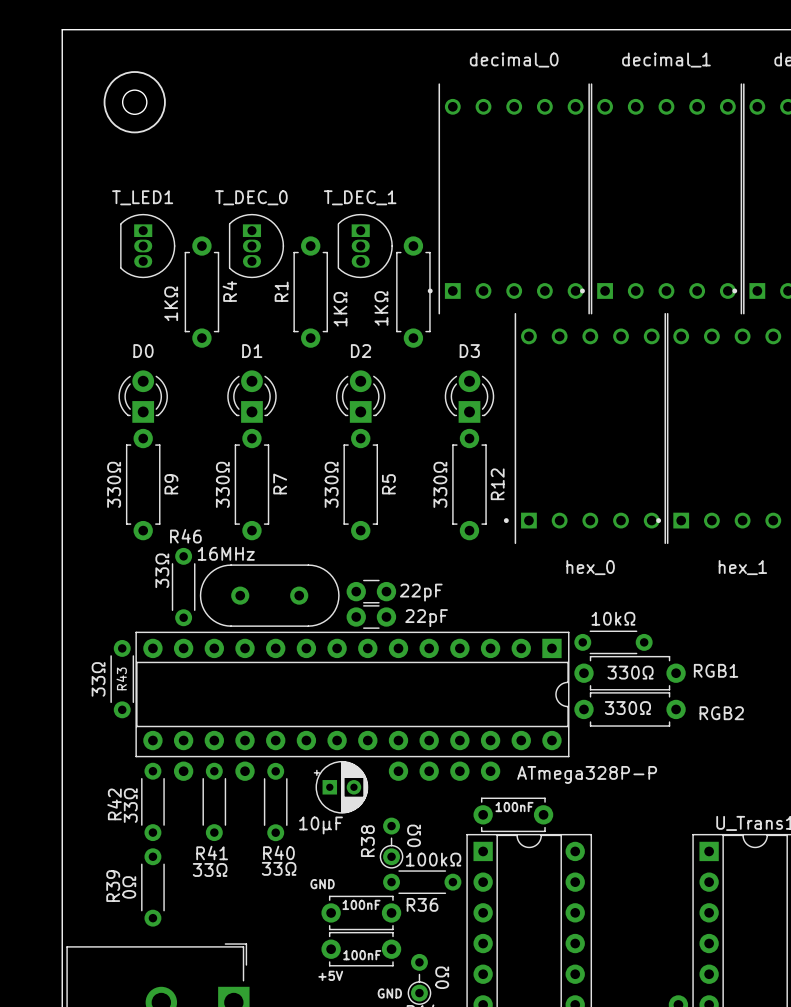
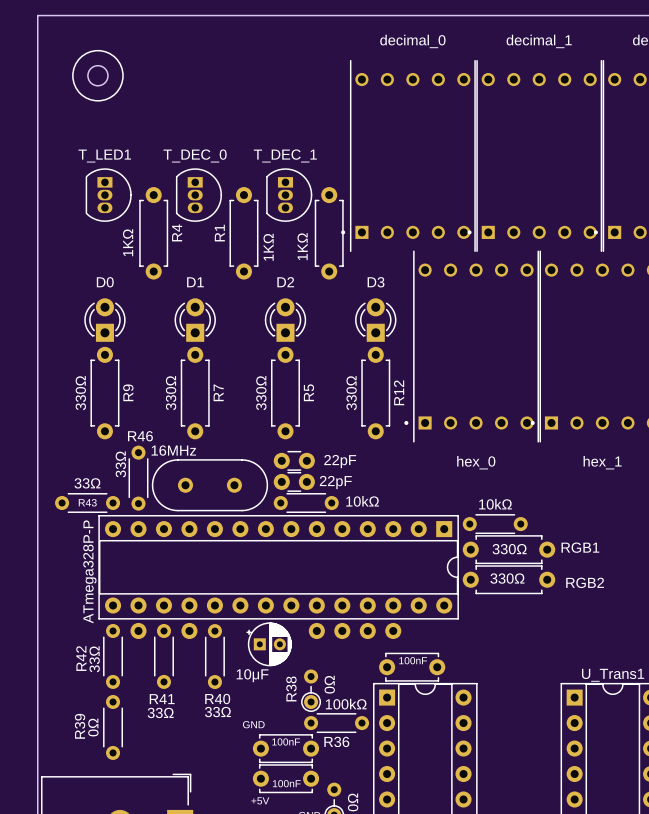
part position: (371, 617) -> (294, 460)
part: none -> 10kΩ (306, 503)
R43 rotation: 0° (122, 679) -> 90° clockwise (87, 503)
R43 position: (122, 679) -> (87, 503)
part value rotation: 0° (587, 774) -> 90° counterclockwise (89, 571)
part value position: ATmega328P-P (587, 774) -> ATmega328P-P (89, 571)

